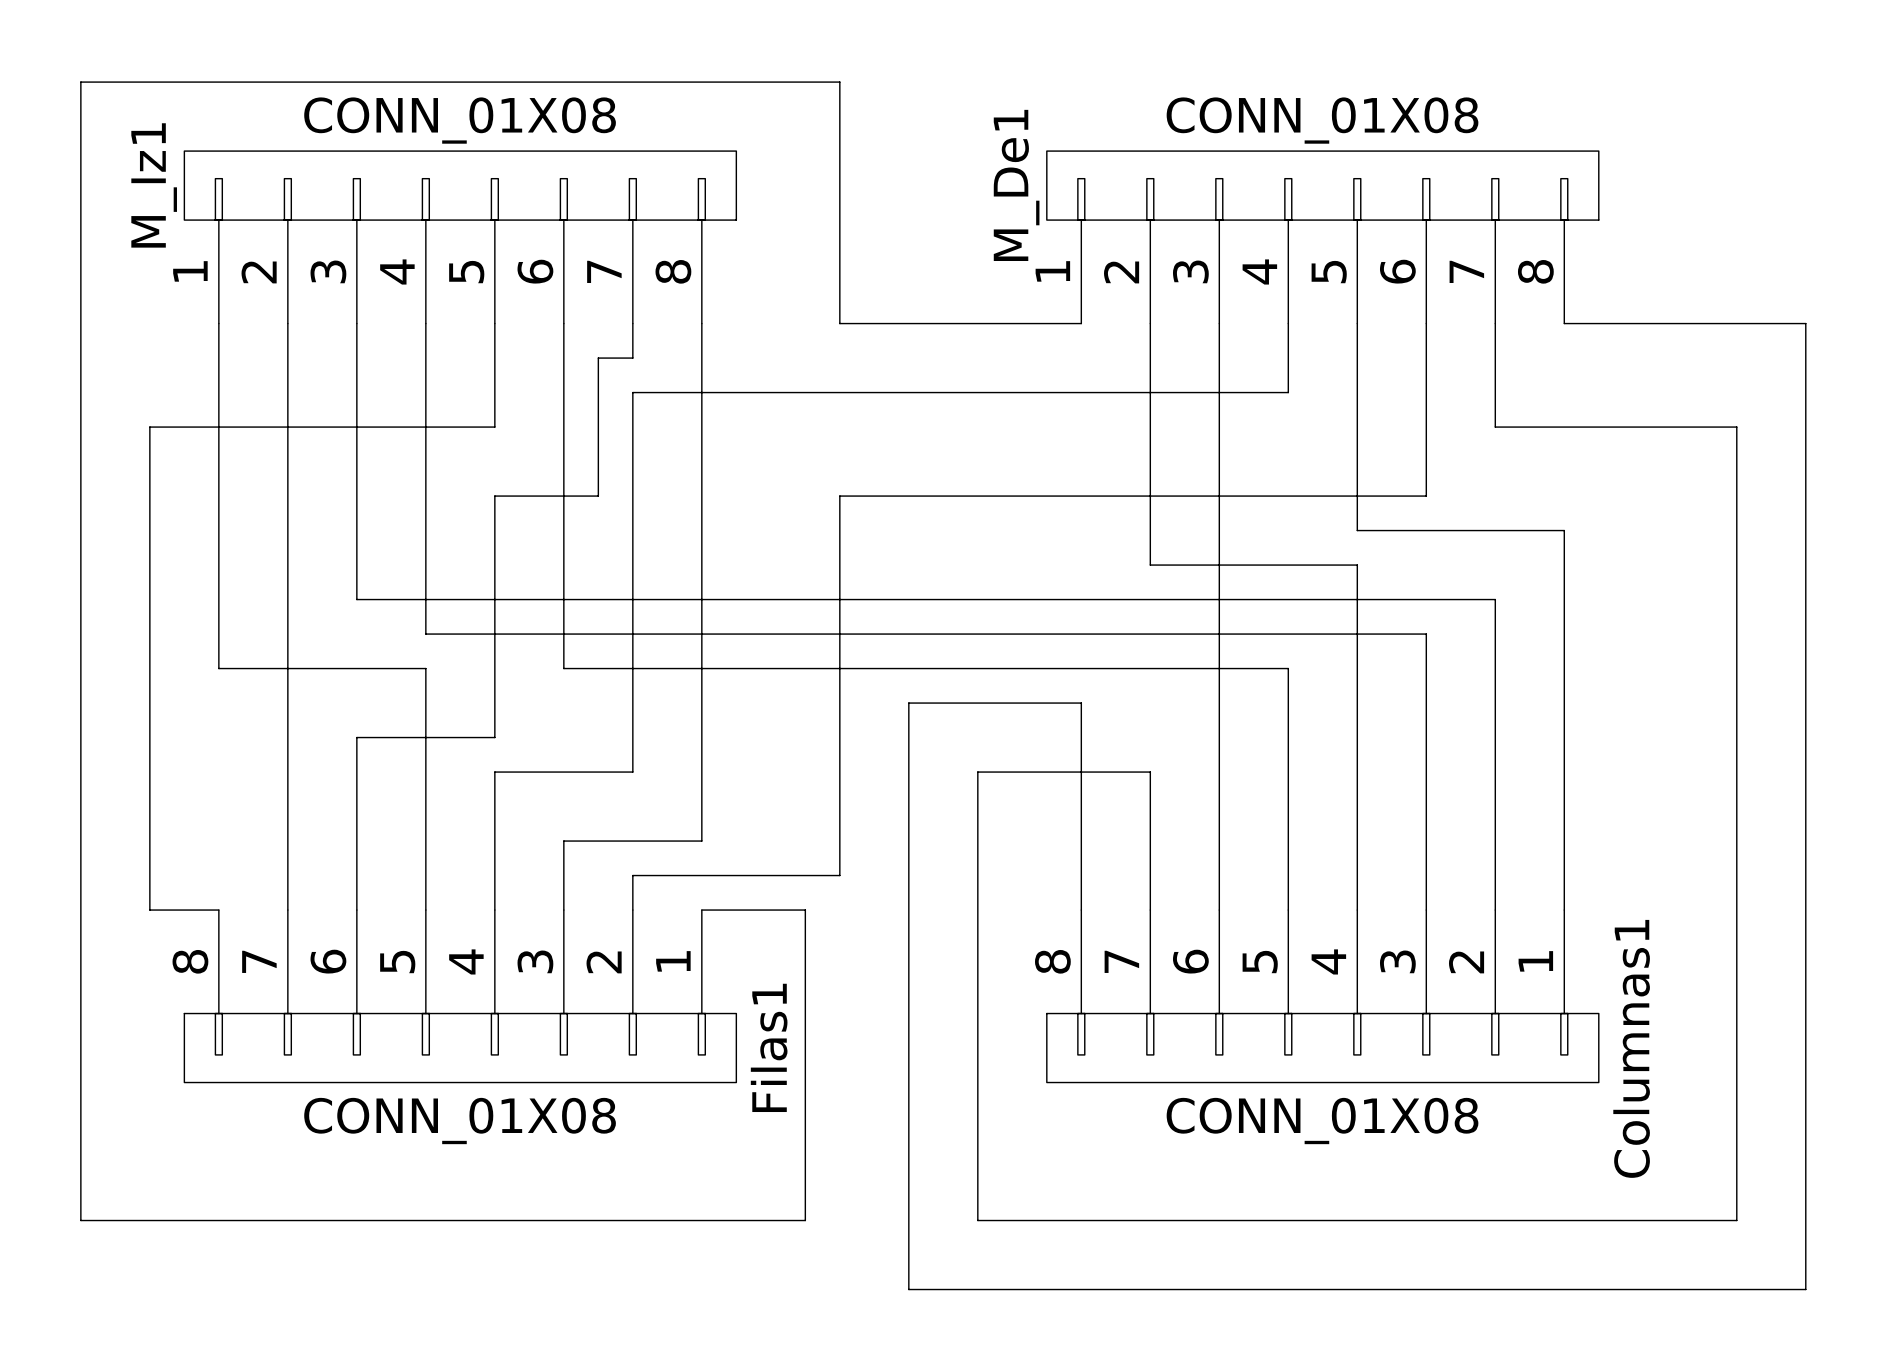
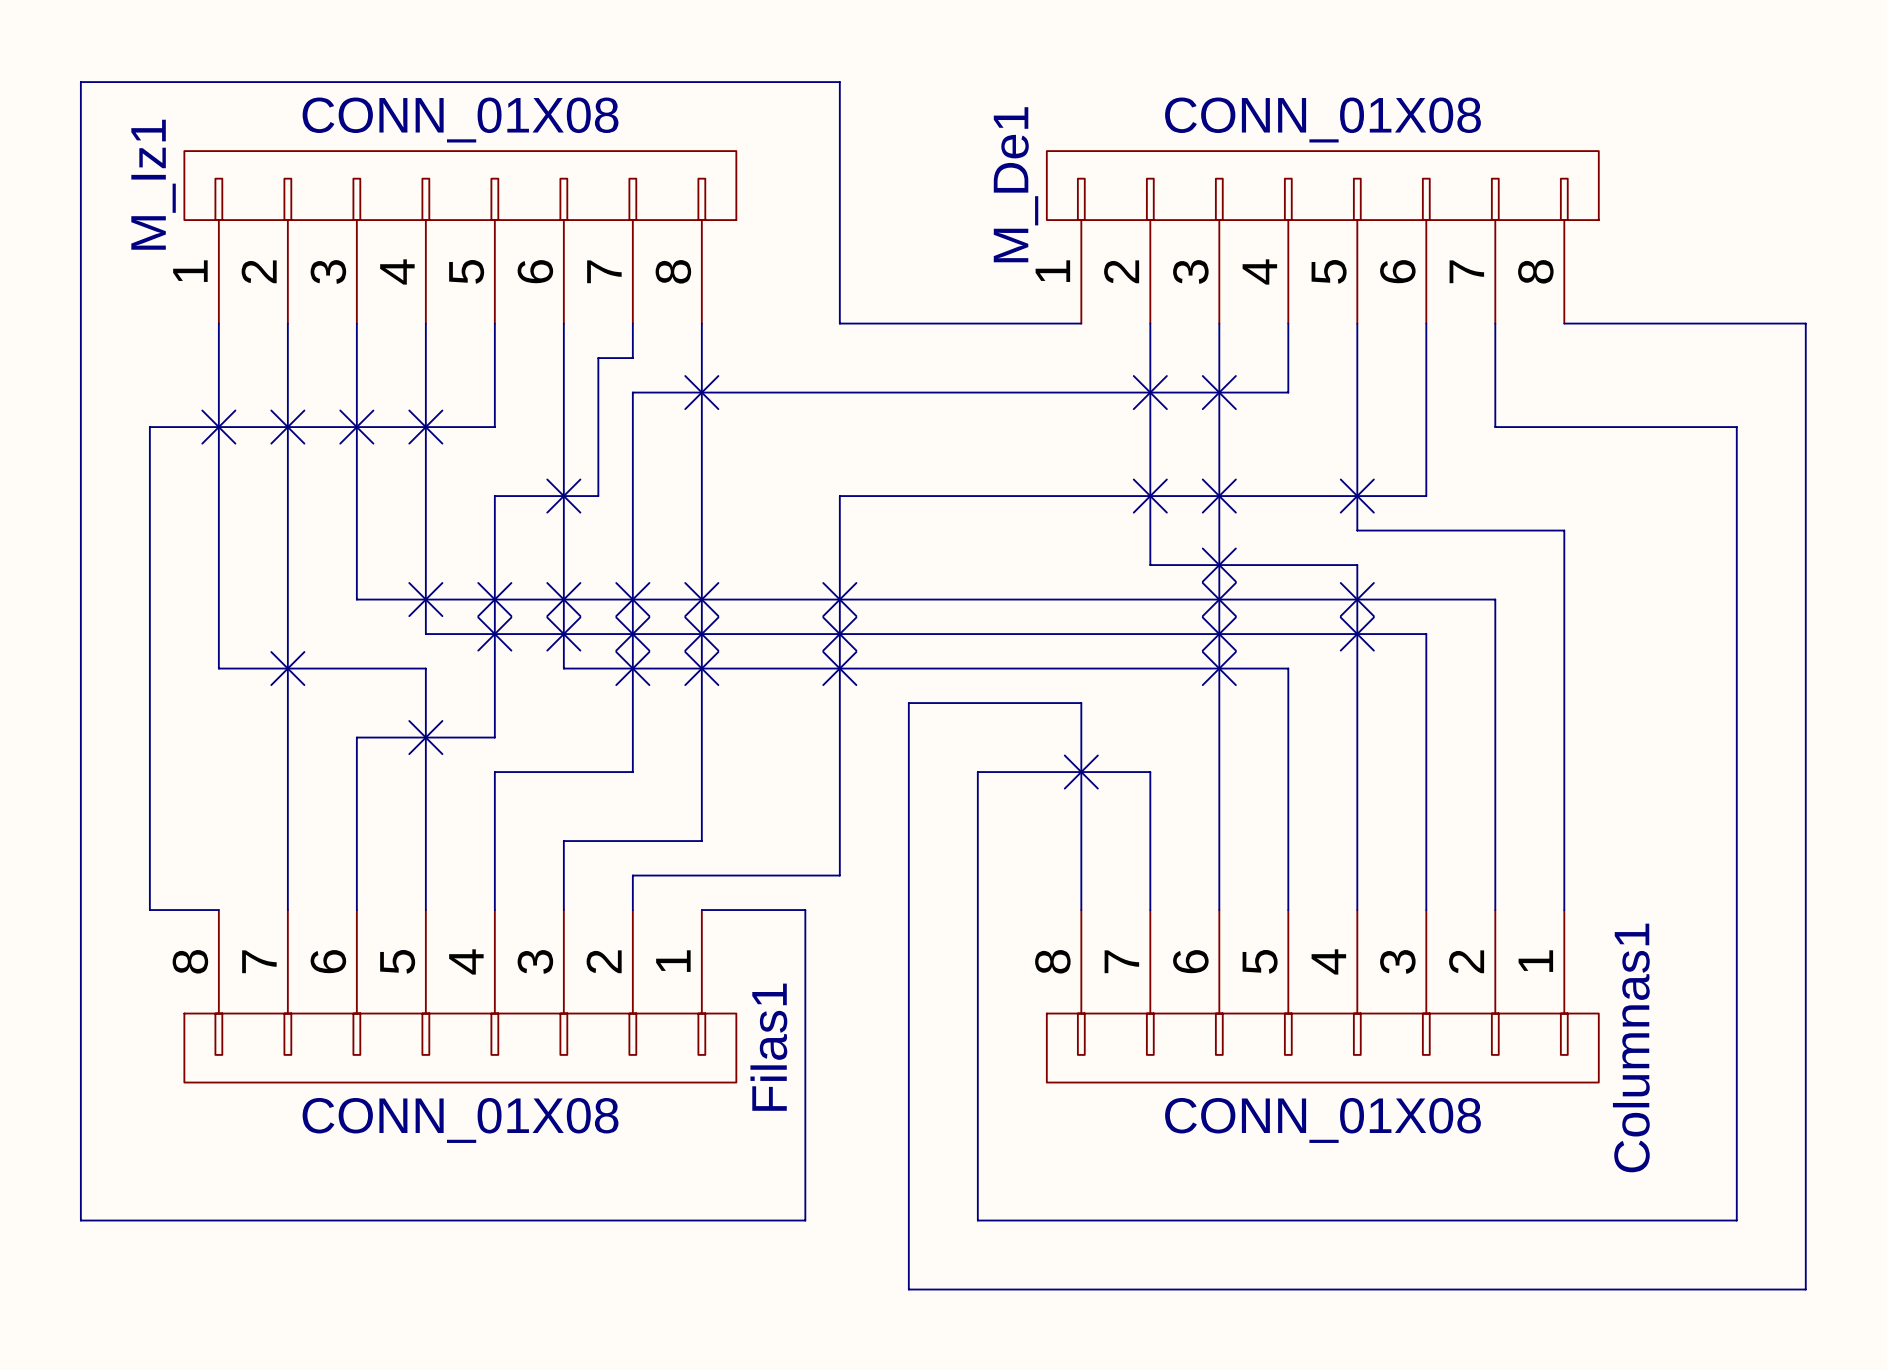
no-connect mark: none -> (701, 392)
no-connect mark: none -> (1150, 392)
no-connect mark: none -> (1219, 392)
no-connect mark: none -> (218, 427)
no-connect mark: none -> (287, 427)
no-connect mark: none -> (356, 427)
no-connect mark: none -> (425, 427)
no-connect mark: none -> (563, 496)
no-connect mark: none -> (1150, 496)
no-connect mark: none -> (1219, 496)
no-connect mark: none -> (1357, 496)
no-connect mark: none -> (1219, 565)
no-connect mark: none -> (425, 599)
no-connect mark: none -> (494, 599)
no-connect mark: none -> (563, 599)
no-connect mark: none -> (632, 599)
no-connect mark: none -> (701, 599)
no-connect mark: none -> (839, 599)
no-connect mark: none -> (1219, 599)
no-connect mark: none -> (1357, 599)
no-connect mark: none -> (494, 634)
no-connect mark: none -> (563, 634)
no-connect mark: none -> (632, 634)
no-connect mark: none -> (701, 634)
no-connect mark: none -> (839, 634)
no-connect mark: none -> (1219, 634)
no-connect mark: none -> (1357, 634)
no-connect mark: none -> (287, 668)
no-connect mark: none -> (632, 668)
no-connect mark: none -> (701, 668)
no-connect mark: none -> (839, 668)
no-connect mark: none -> (1219, 668)
no-connect mark: none -> (425, 737)
no-connect mark: none -> (1081, 772)

